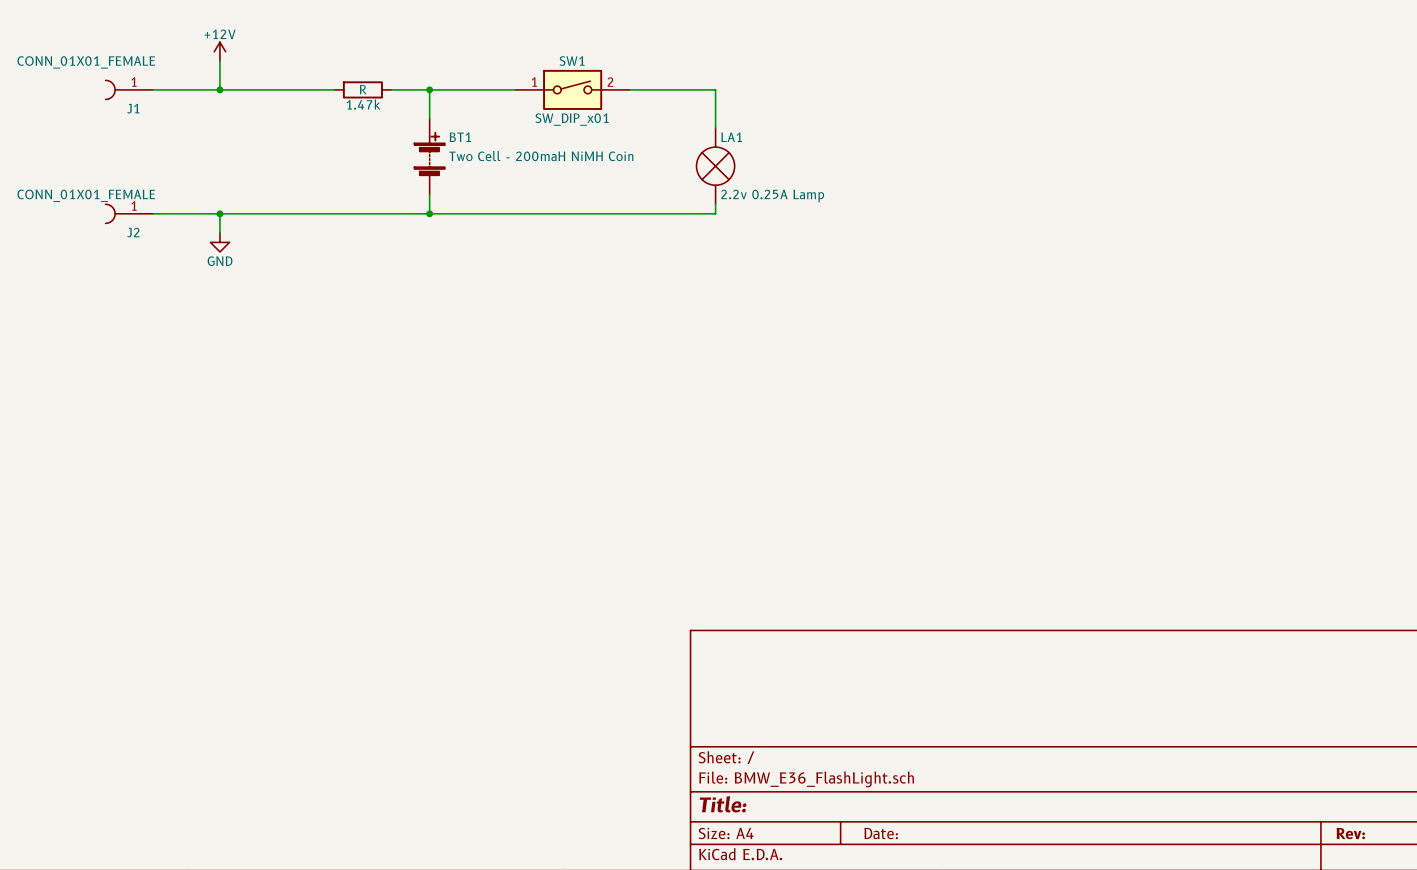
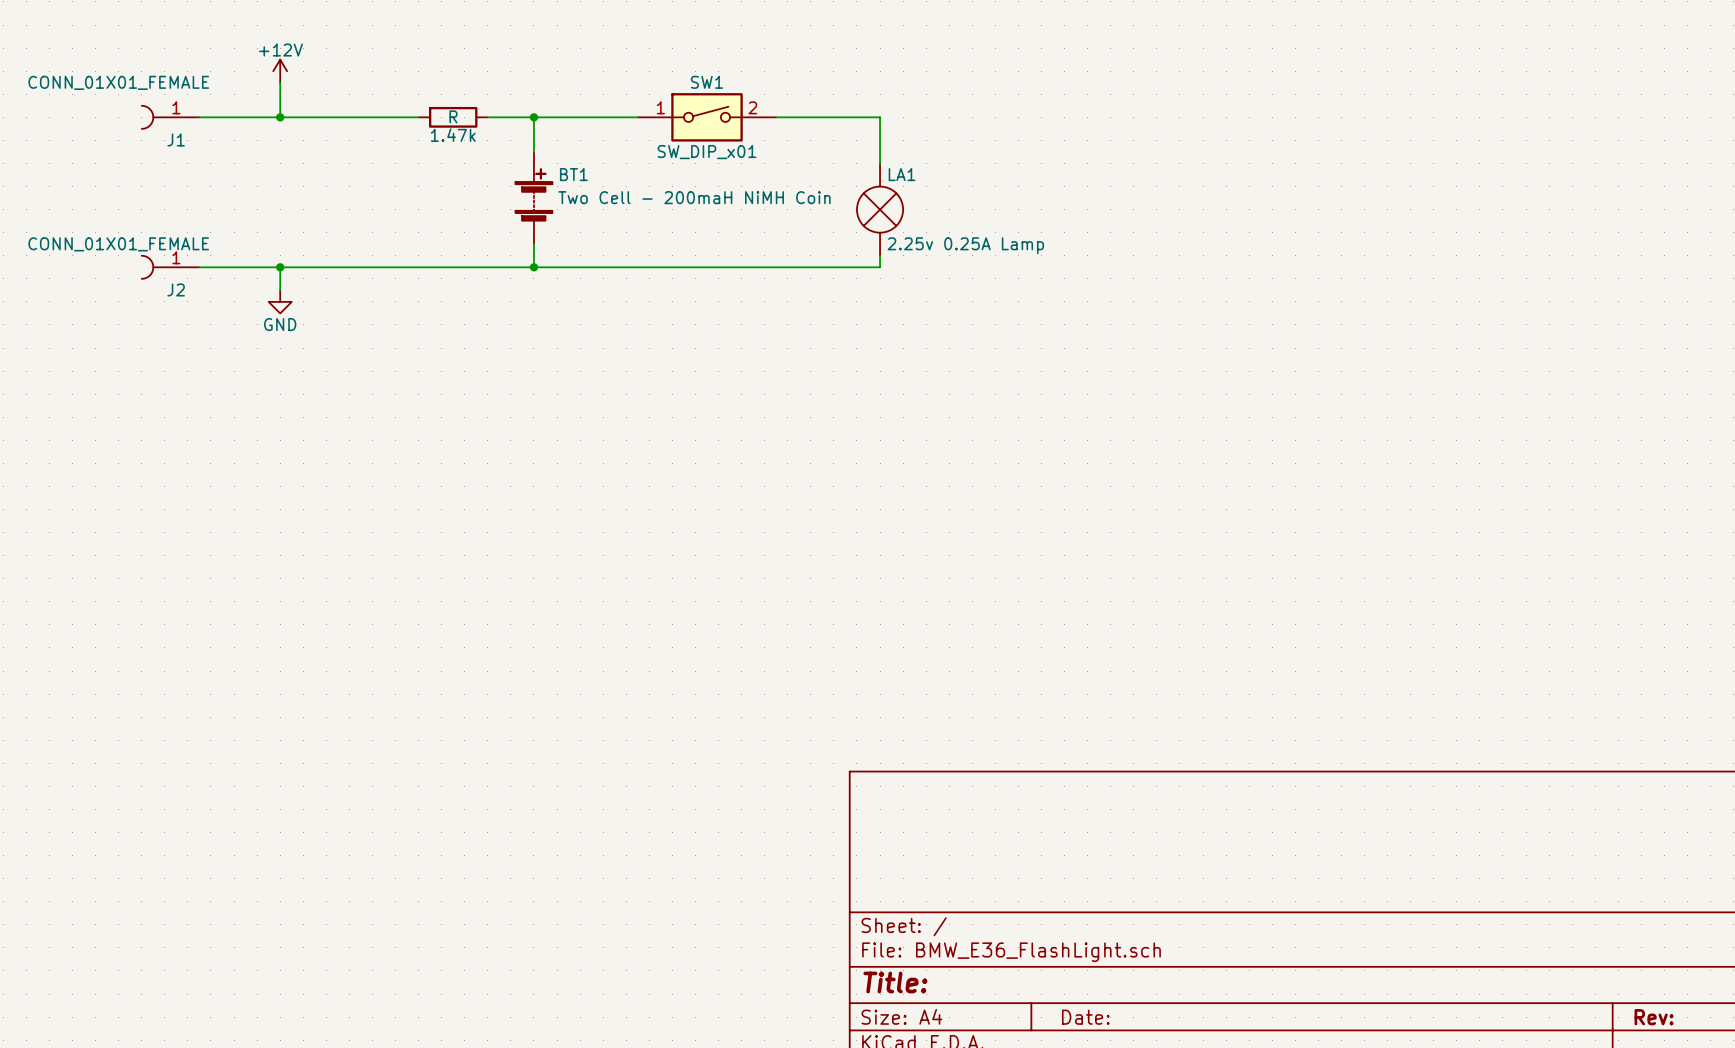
LA1 value: 2.2v 0.25A Lamp (772, 195) -> 2.25v 0.25A Lamp (965, 245)

